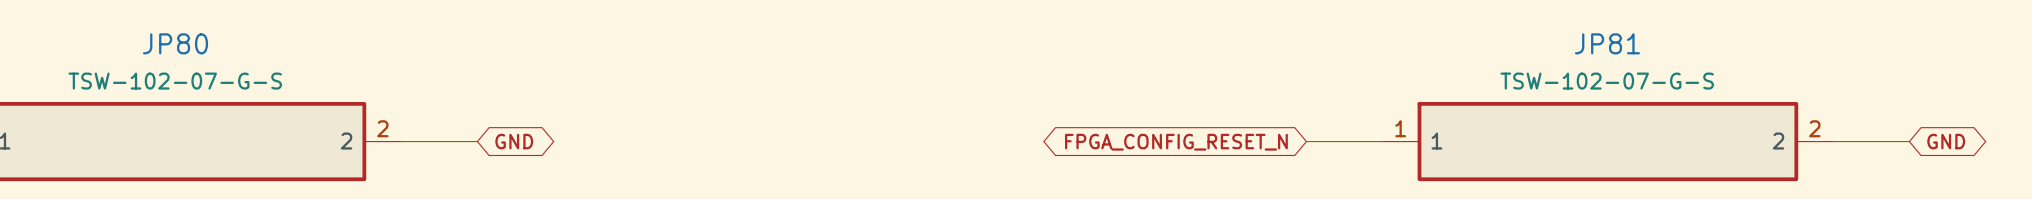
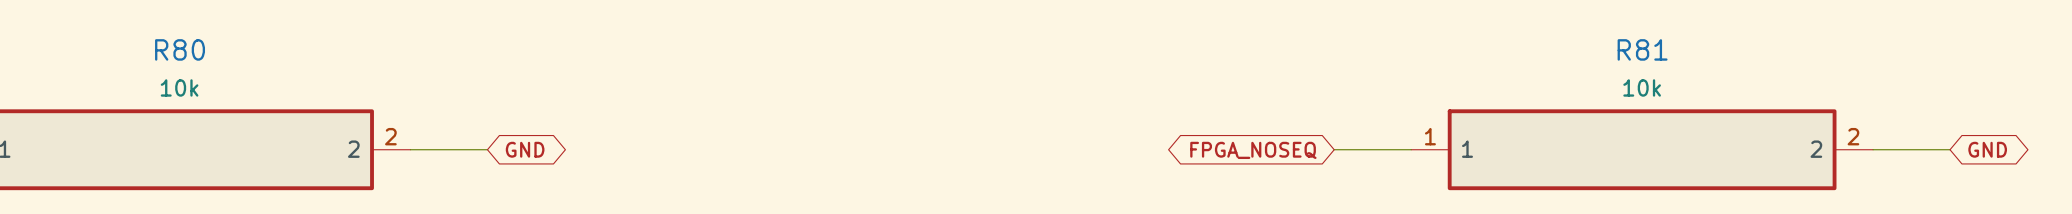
JP80 name: JP80 (175, 43) -> R80 (180, 49)
JP81 name: JP81 (1607, 43) -> R81 (1642, 49)
JP80 value: TSW-102-07-G-S (175, 81) -> 10k (179, 87)
JP81 value: TSW-102-07-G-S (1607, 81) -> 10k (1642, 87)
global label: FPGA_CONFIG_RESET_N (1176, 142) -> FPGA_NOSEQ (1253, 150)

